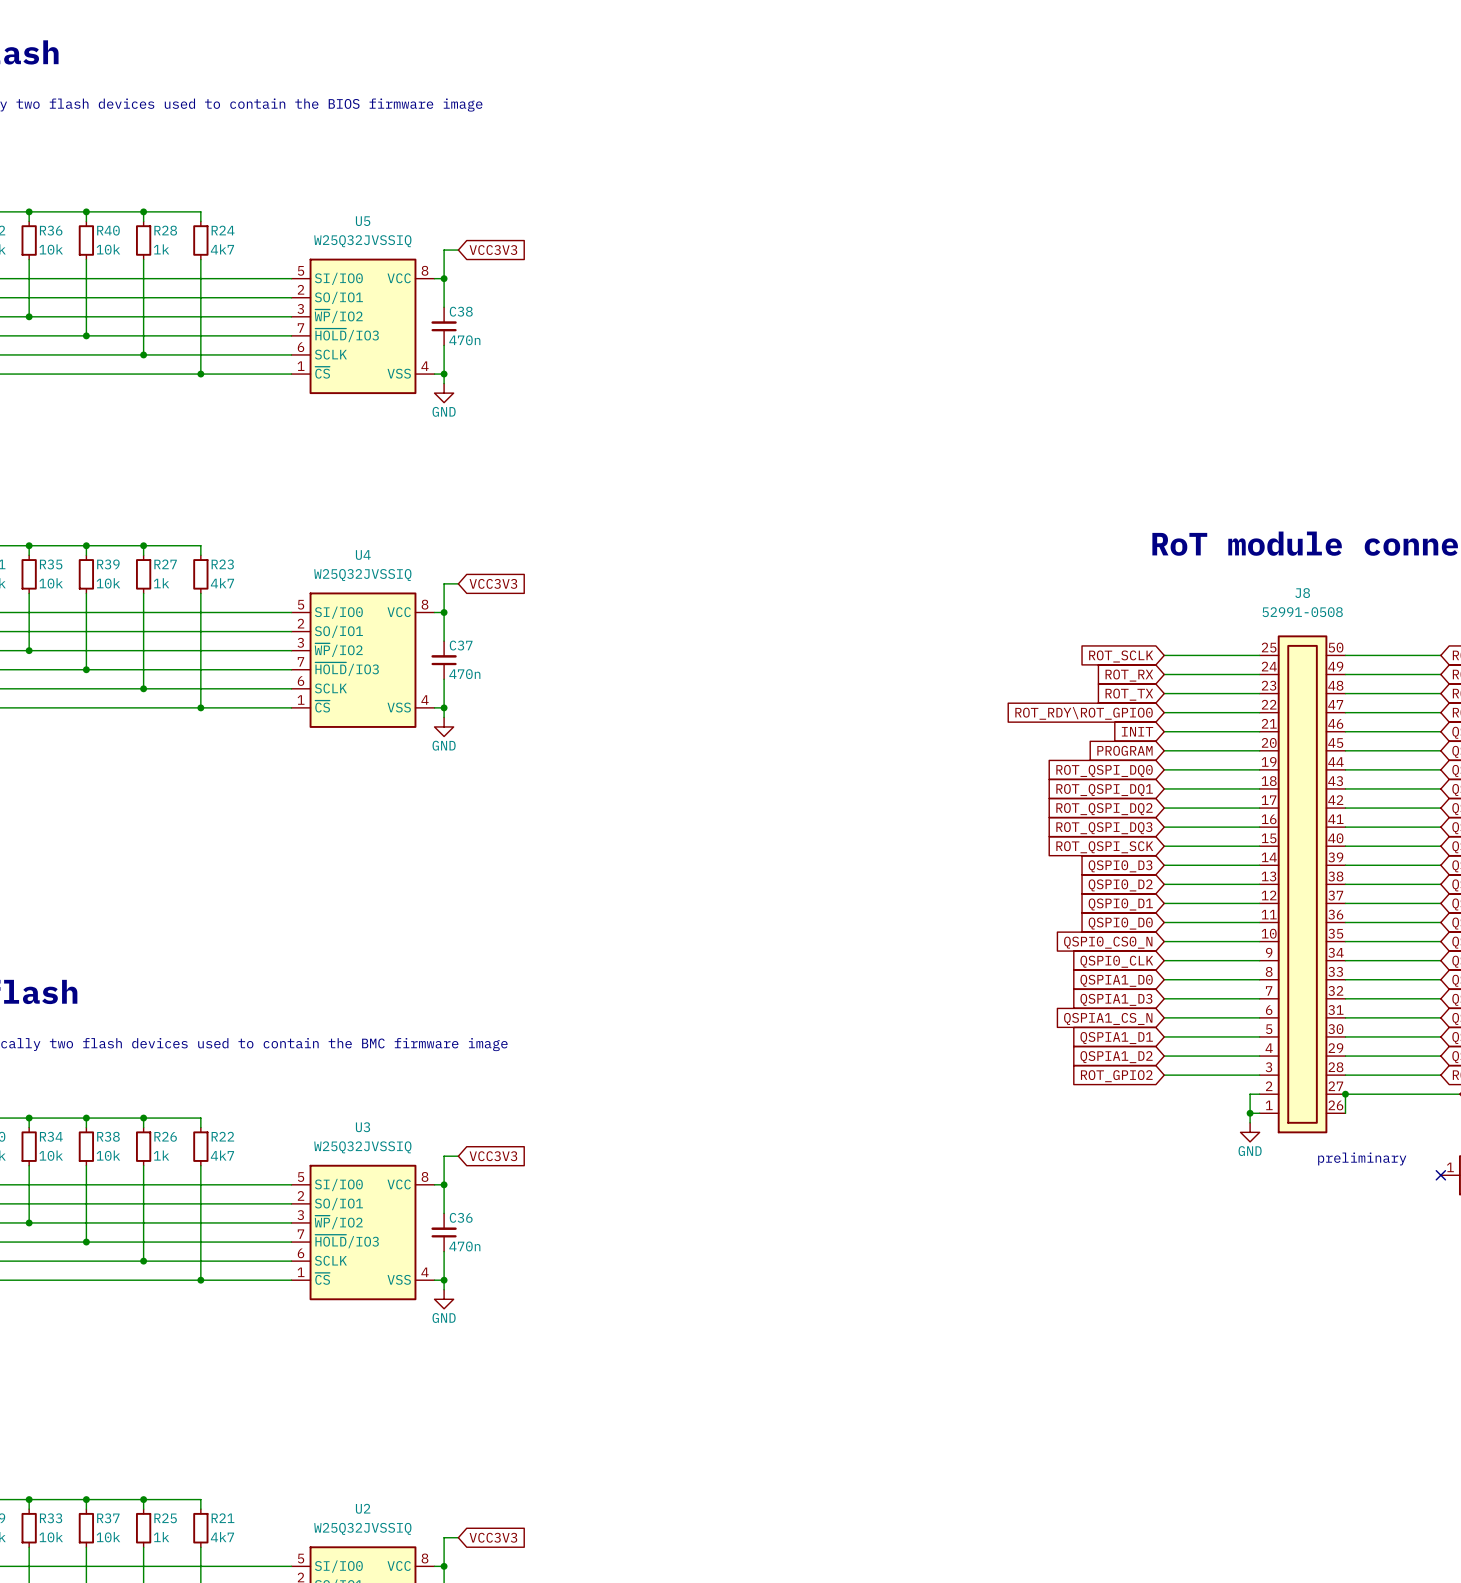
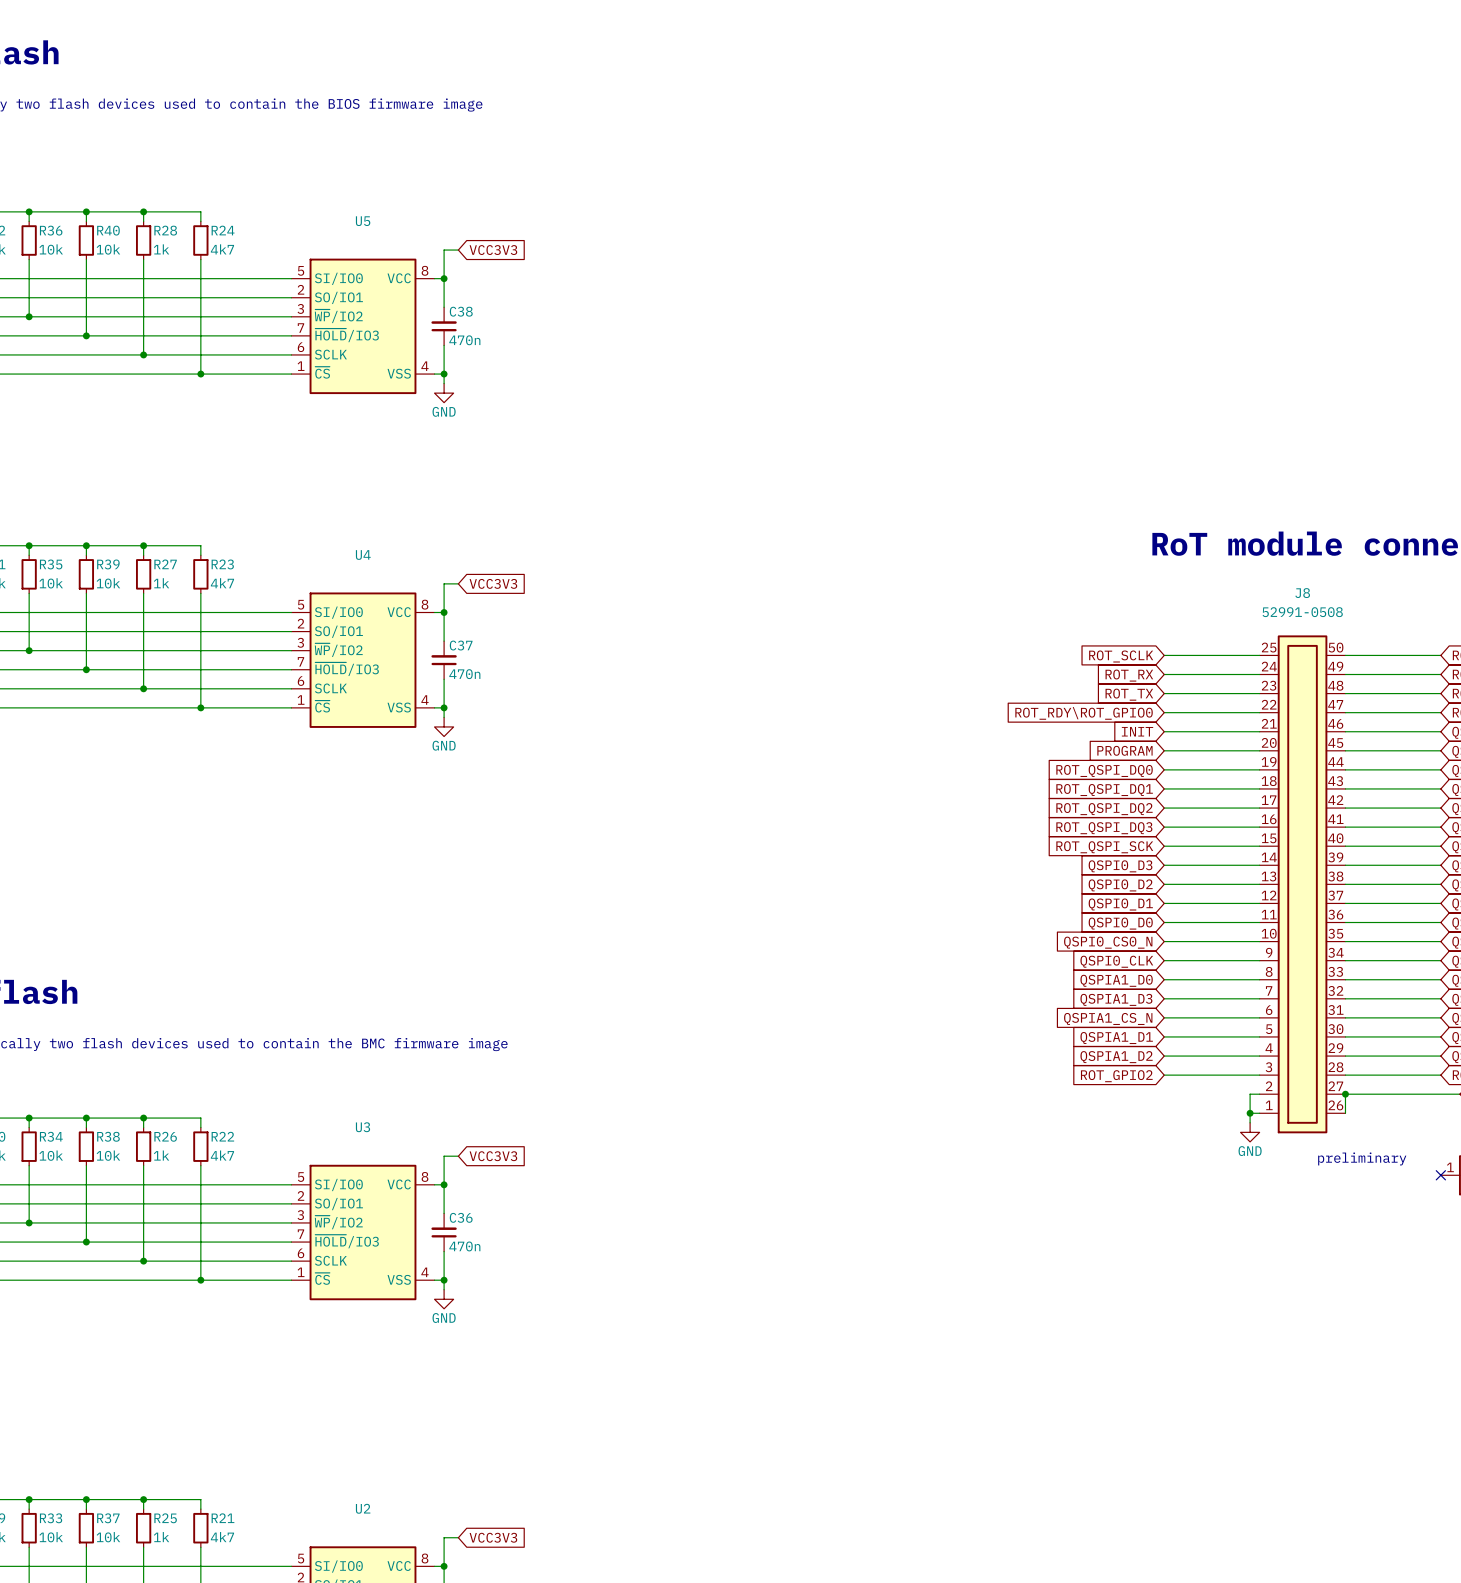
U5 text: W25Q32JVSSIQ (362, 241) -> none
U4 text: W25Q32JVSSIQ (362, 575) -> none
U3 text: W25Q32JVSSIQ (362, 1147) -> none
U2 text: W25Q32JVSSIQ (362, 1528) -> none

